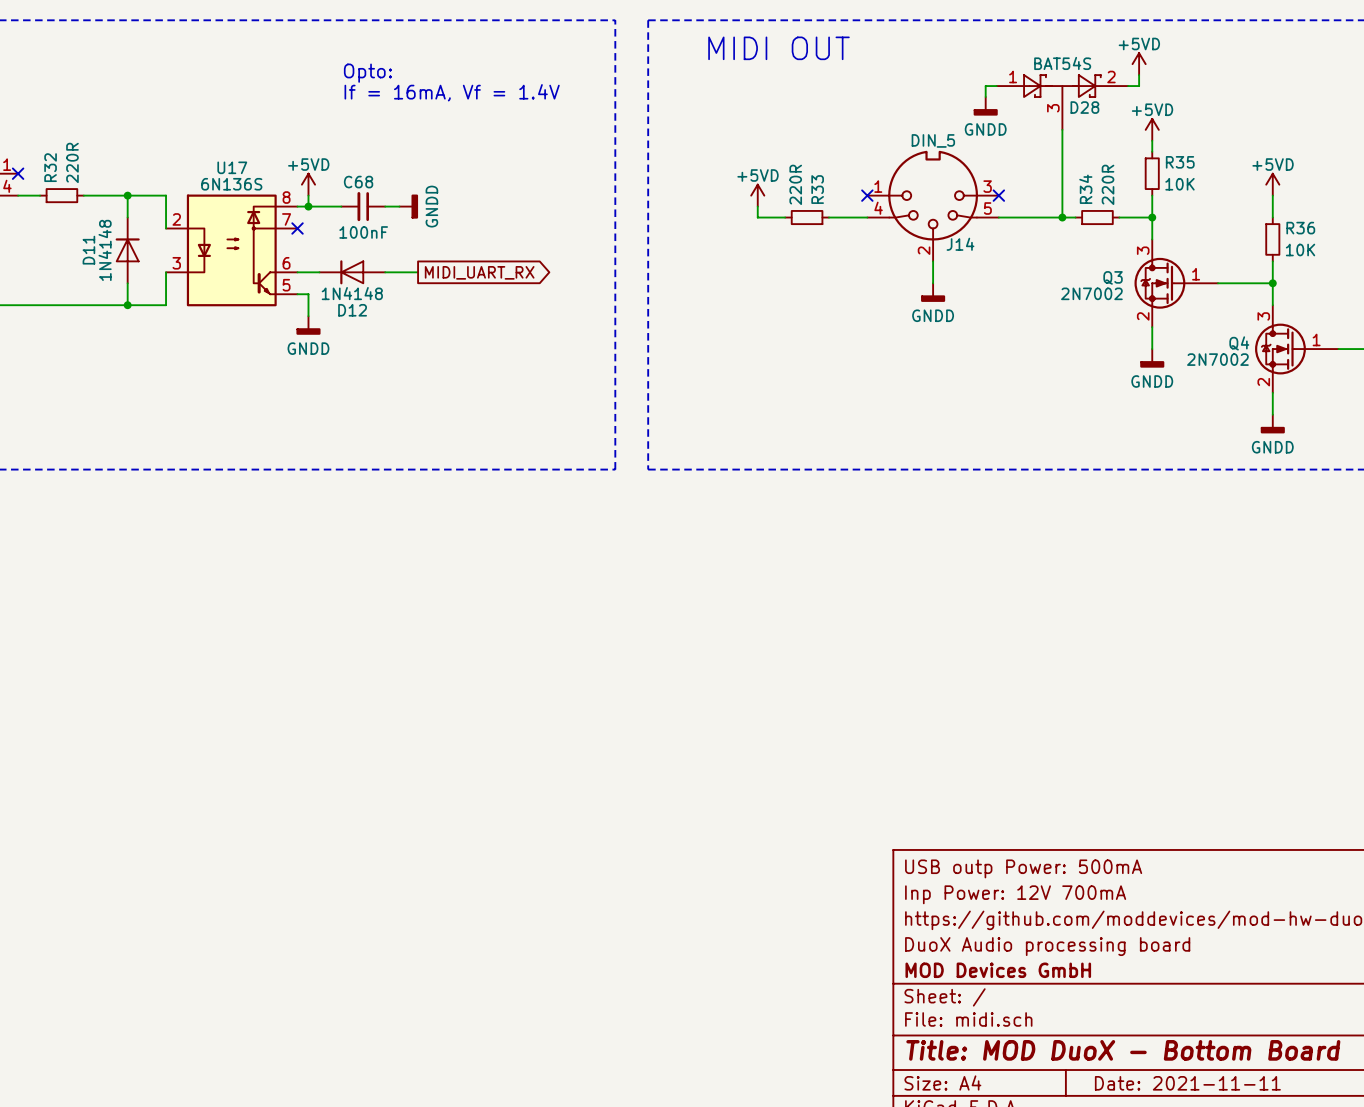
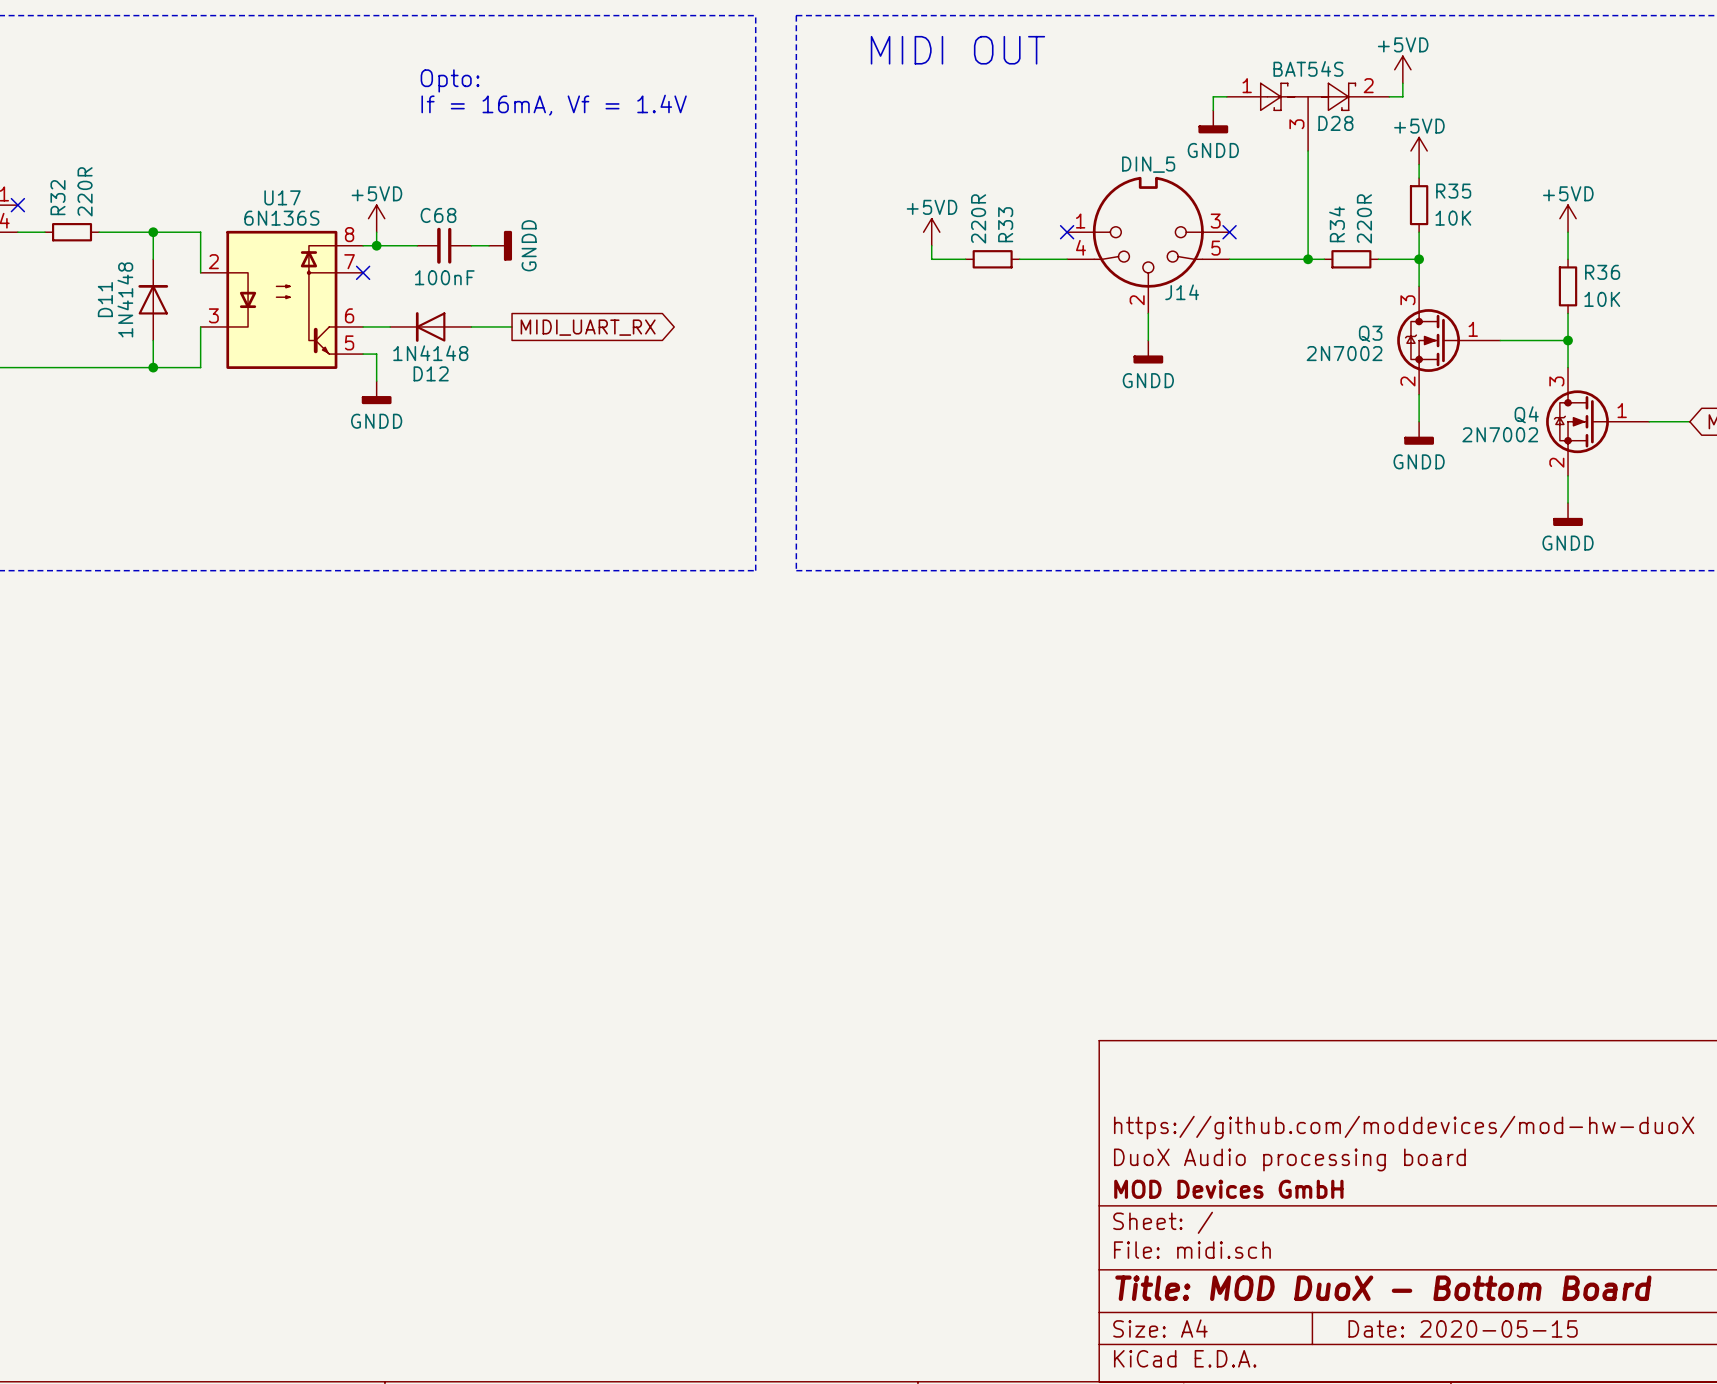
title block: USB outp Power: 500mA (1023, 868) -> none
title block: Inp Power: 12V 700mA (1015, 894) -> none
title block: Date: 2021-11-11 (1187, 1083) -> Date: 2020-05-15 (1463, 1328)

